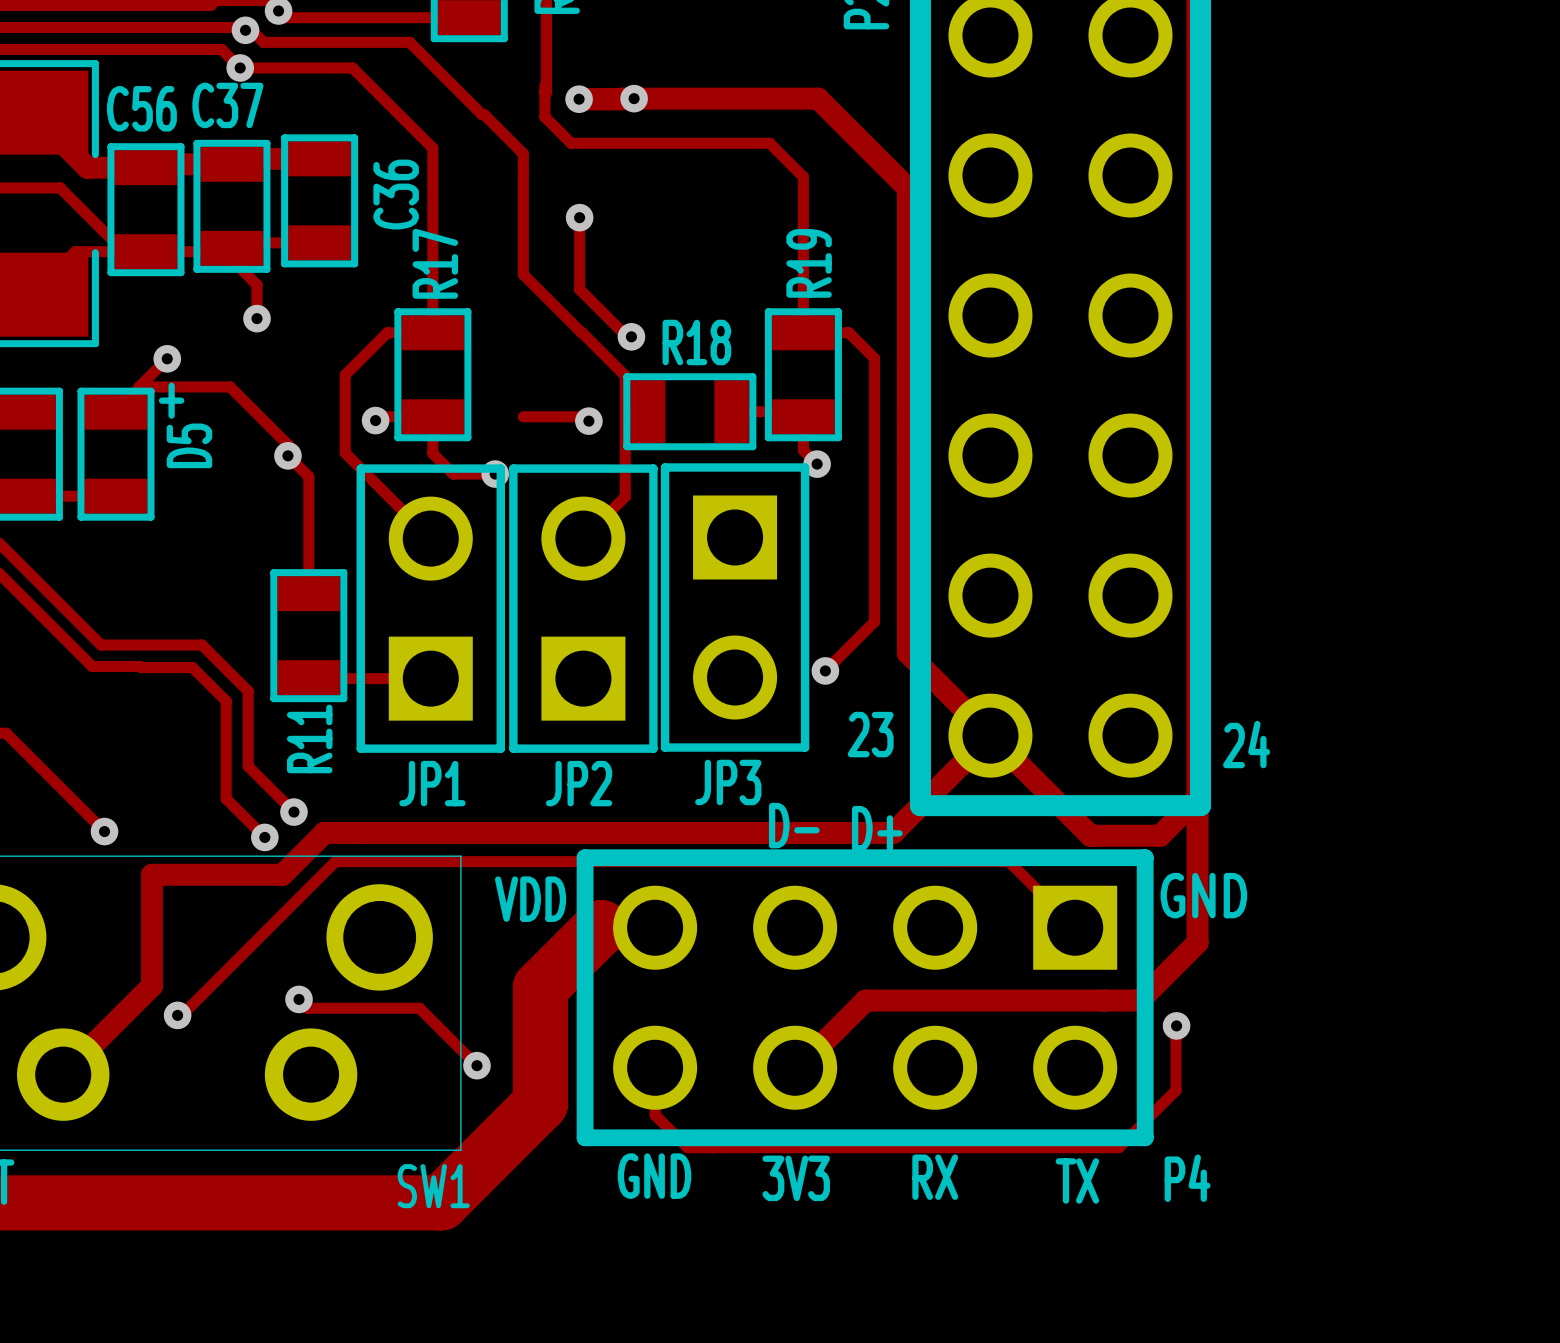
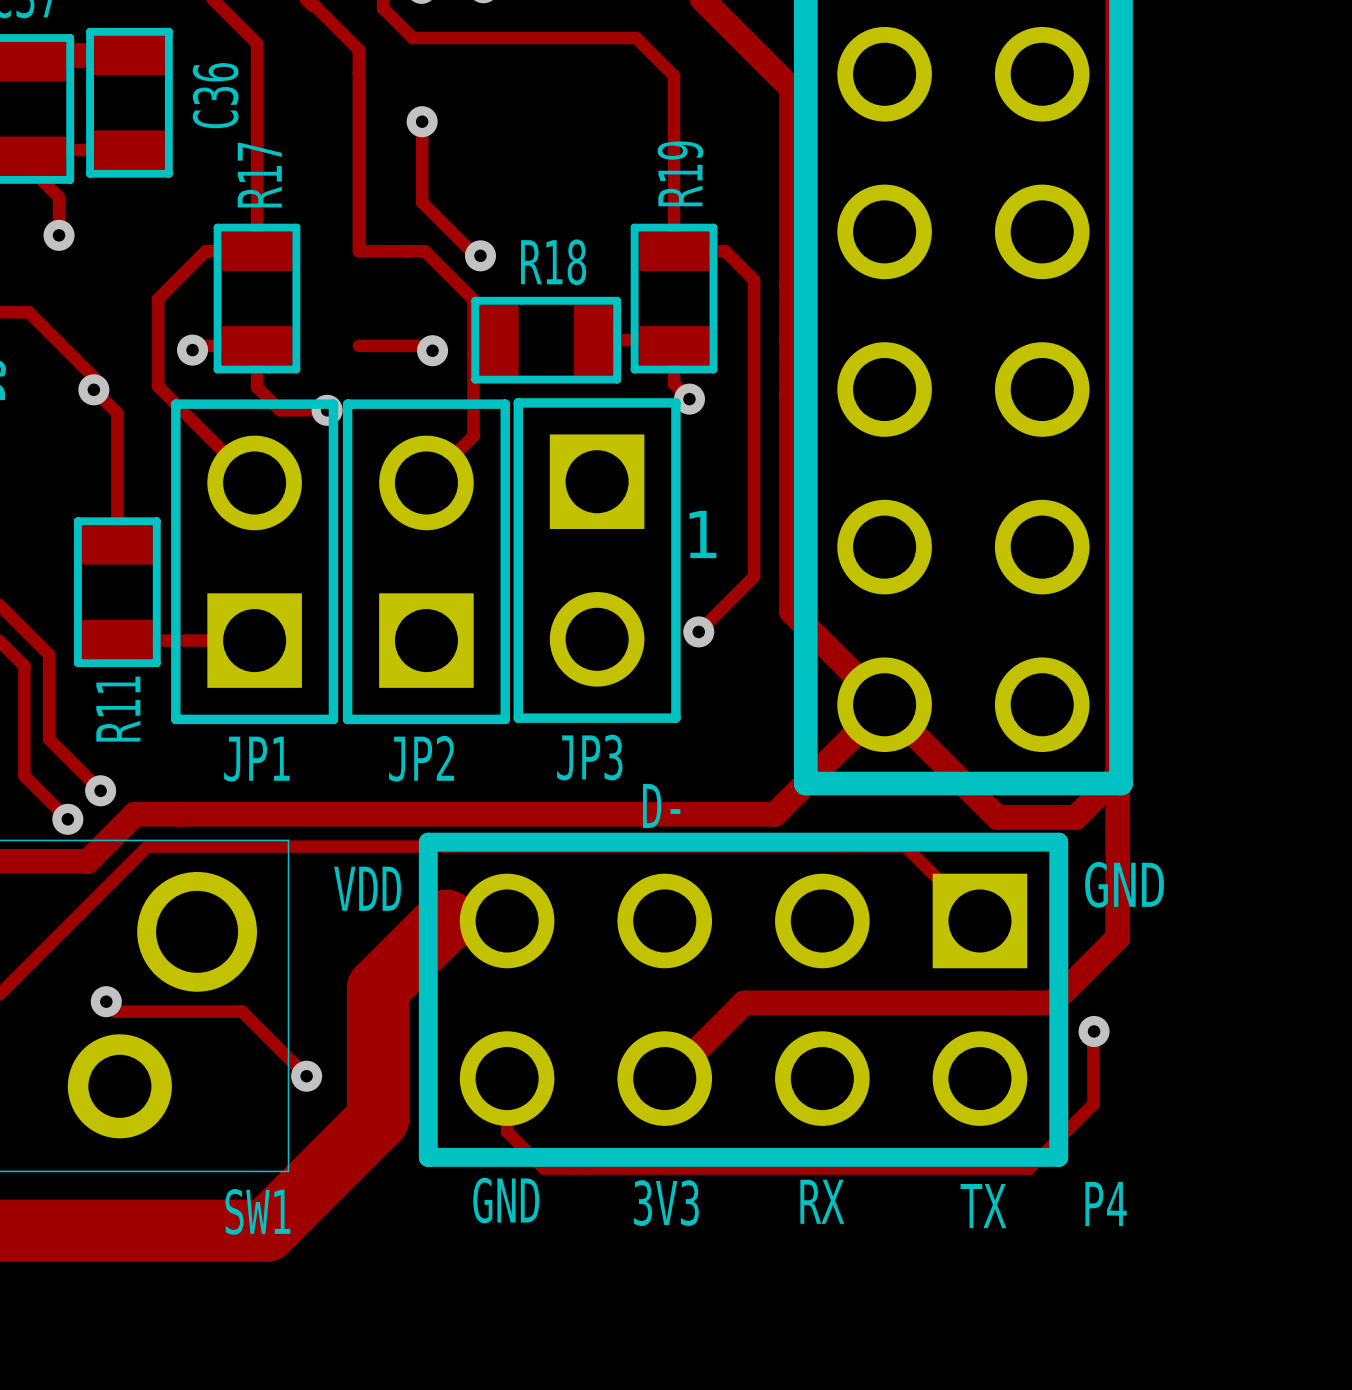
track: (523, 274) (581, 332) -> (358, 185) (358, 251) (424, 251)
text: none -> 1 (702, 534)
text: 23 (870, 734) -> none
text: 24 (1246, 744) -> none
text: D+ (877, 828) -> none

